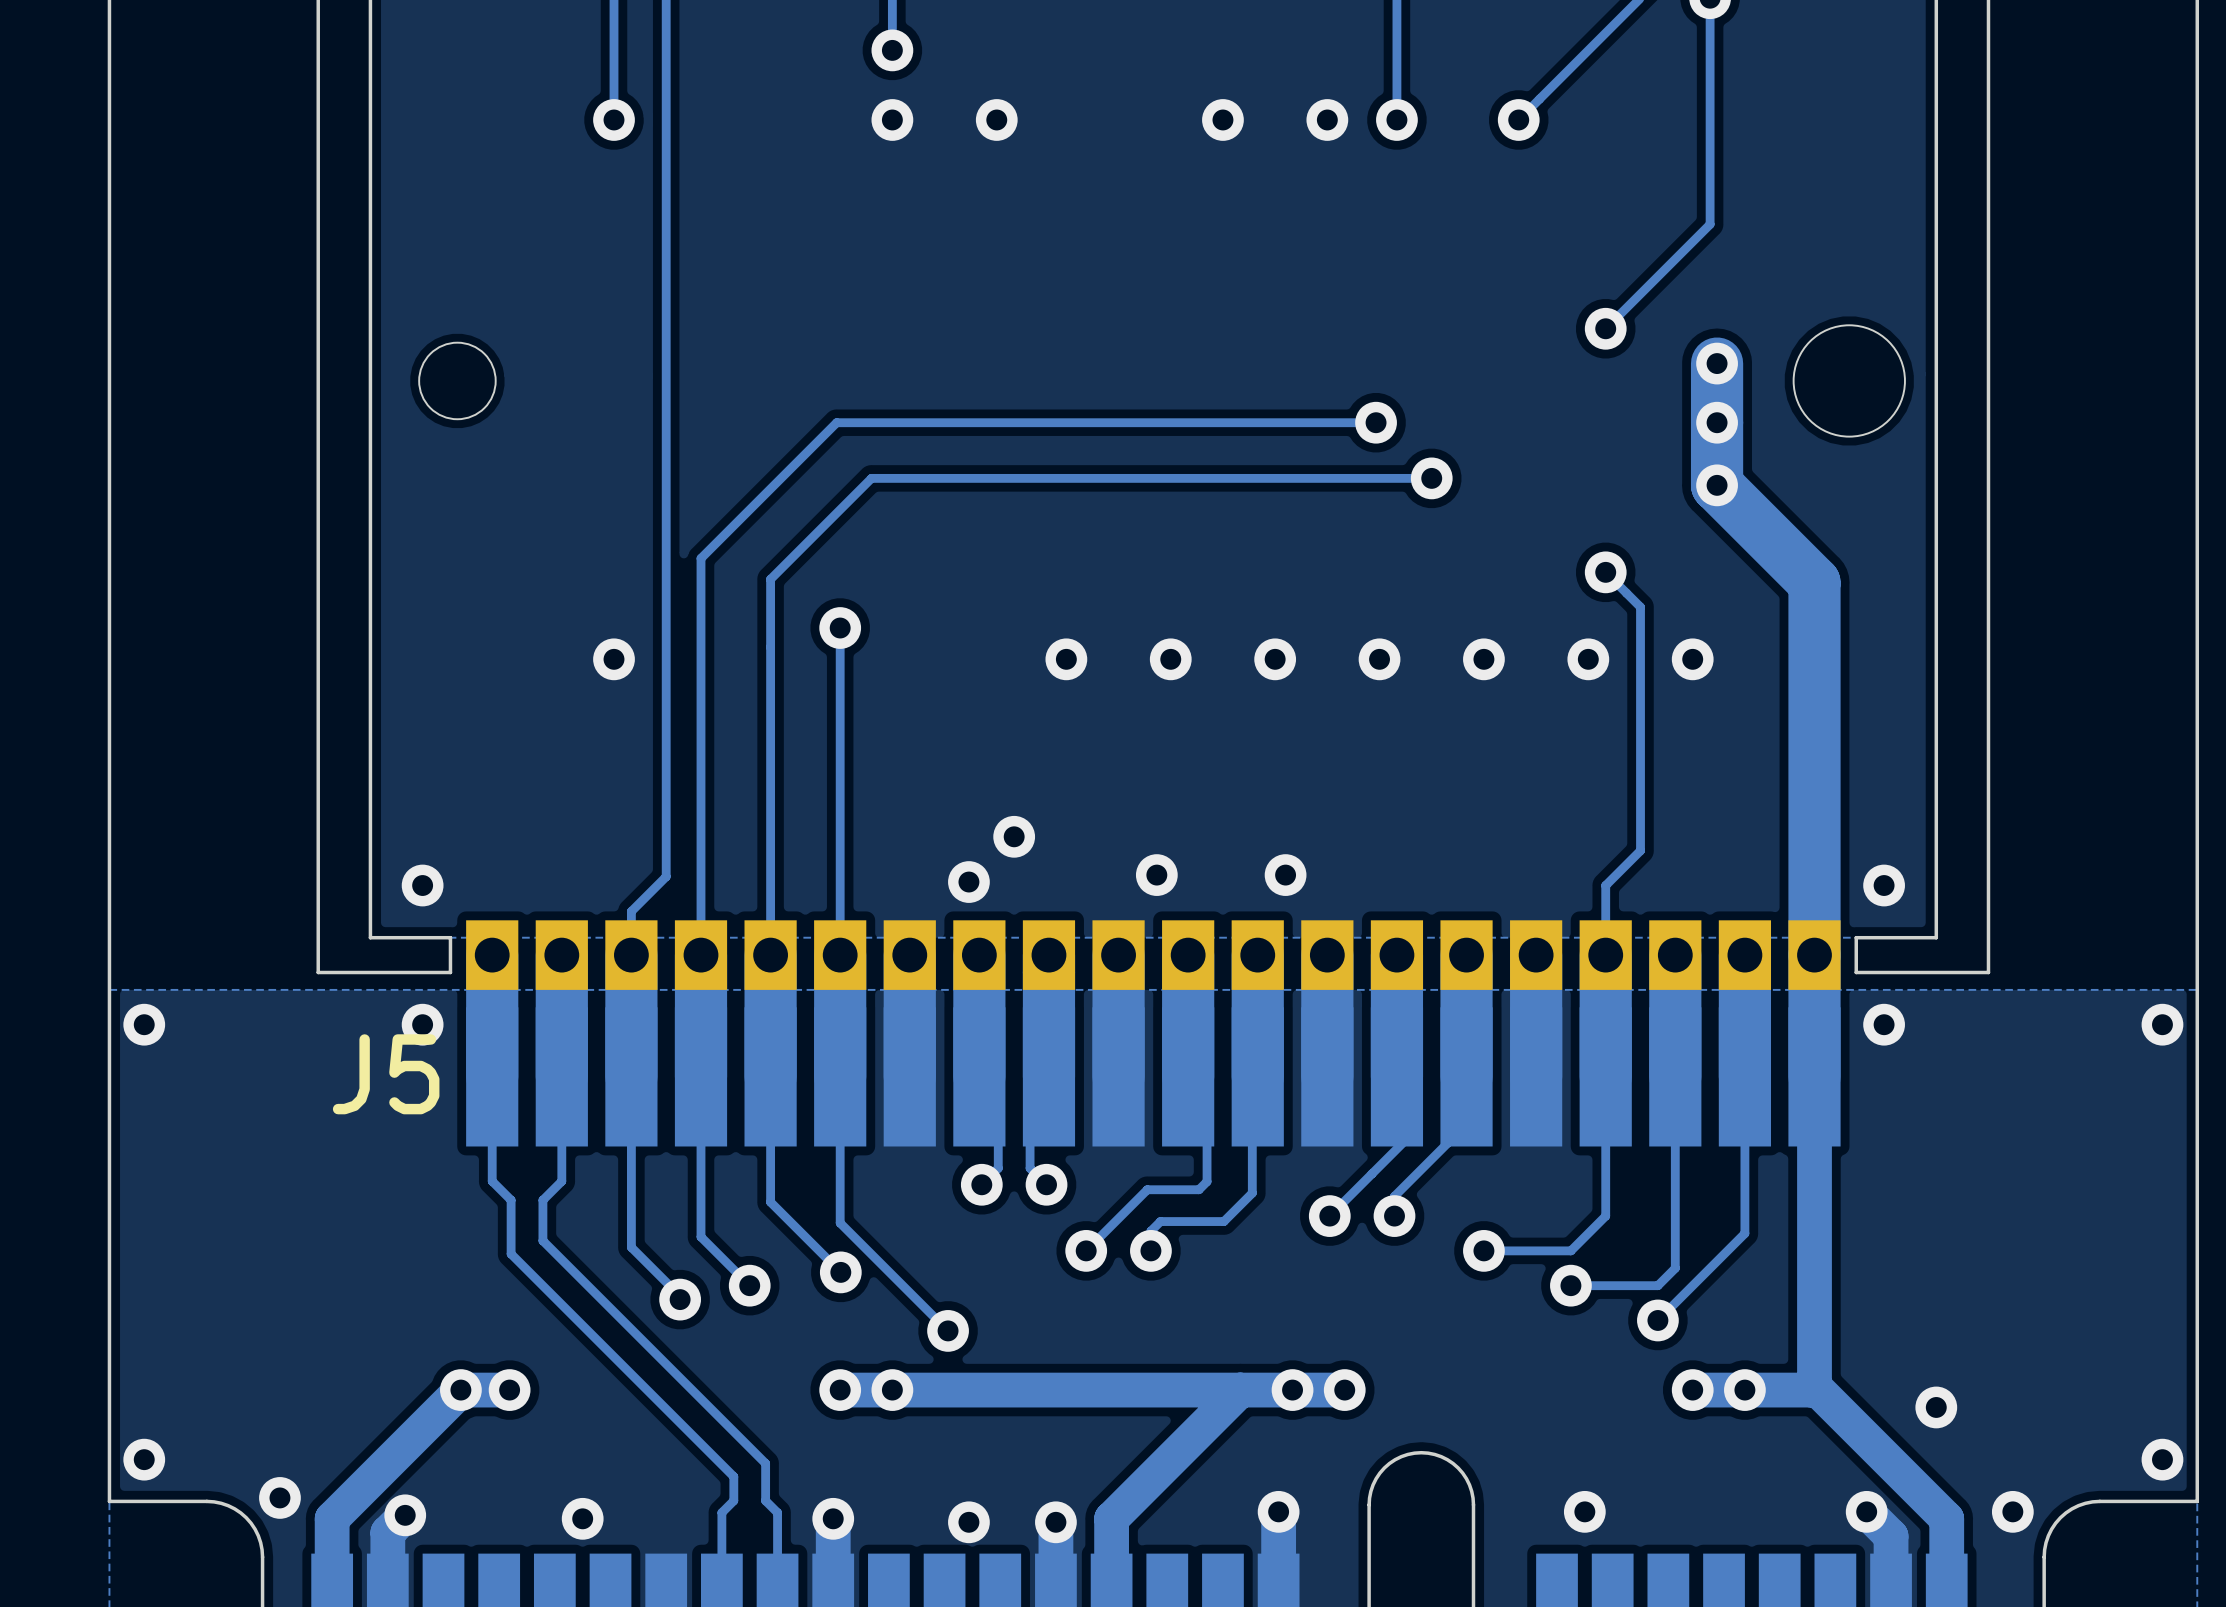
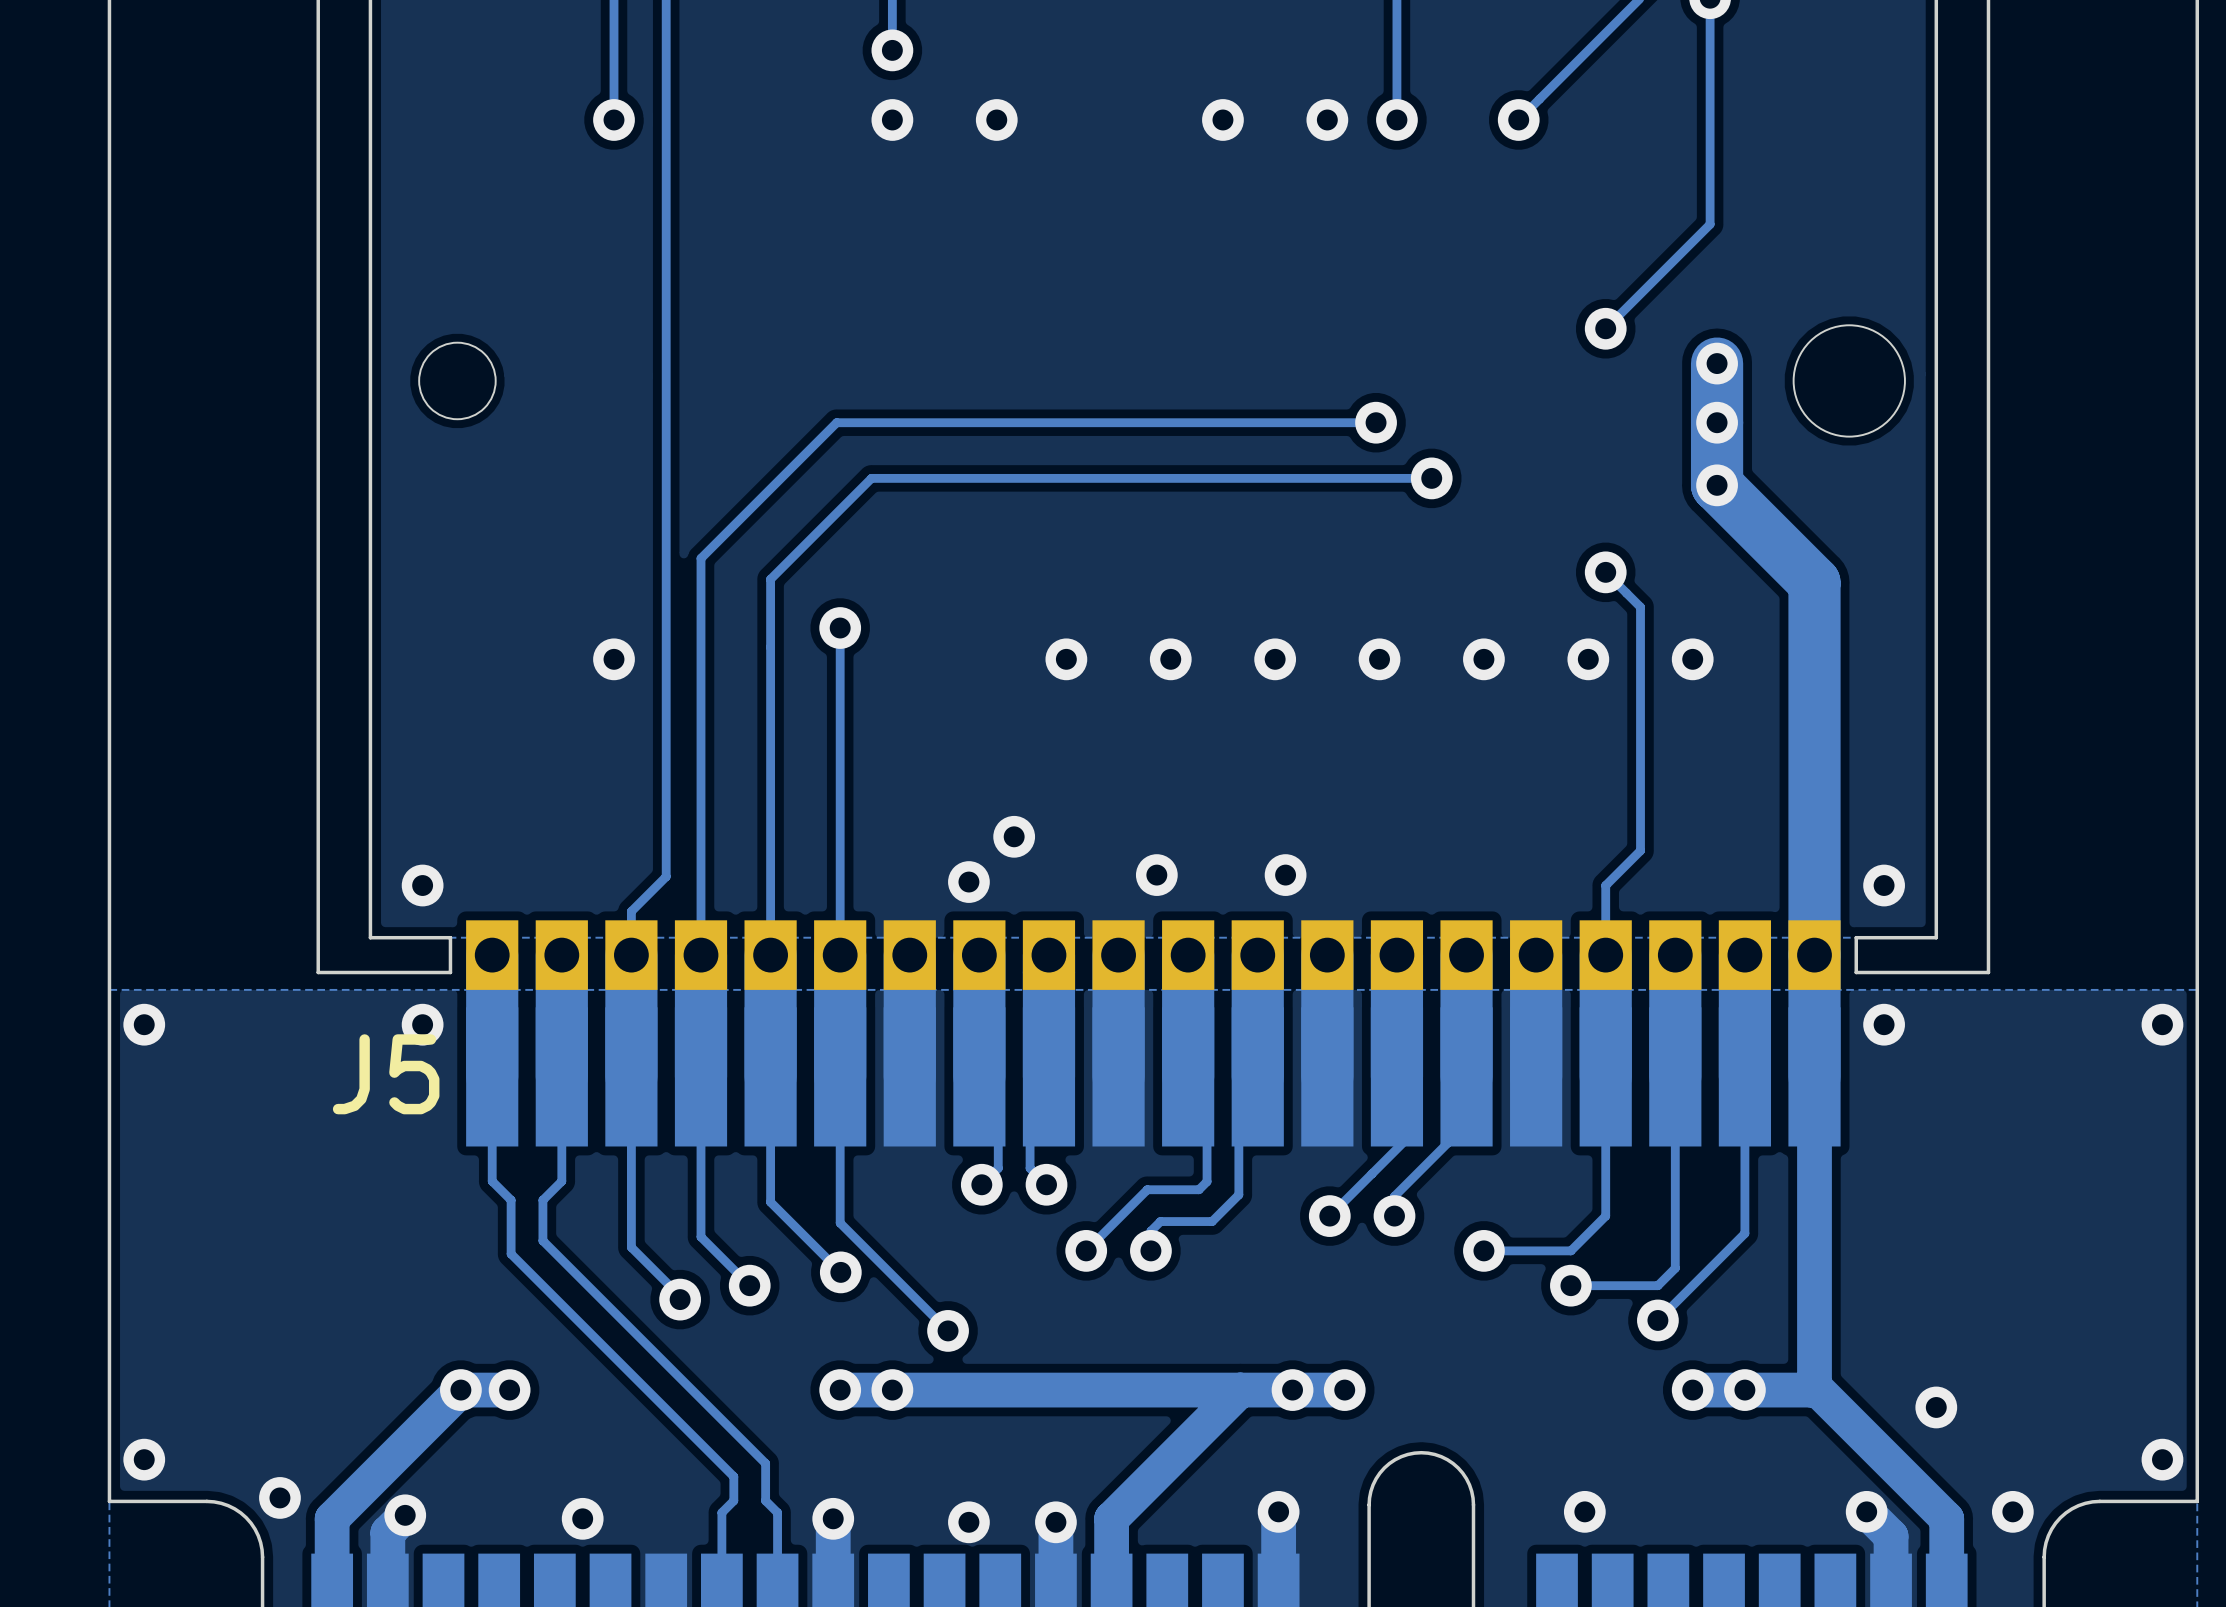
track: (1252, 1075) (1252, 1193) (1223, 1221) (1212, 1221) -> (1238, 1076) (1238, 1194) (1212, 1221)

